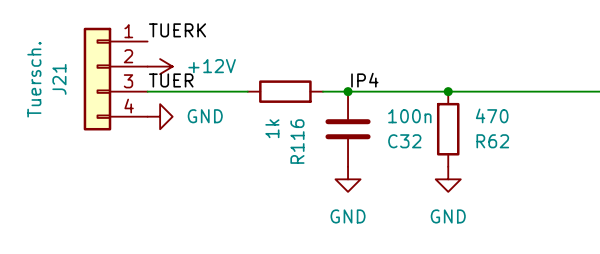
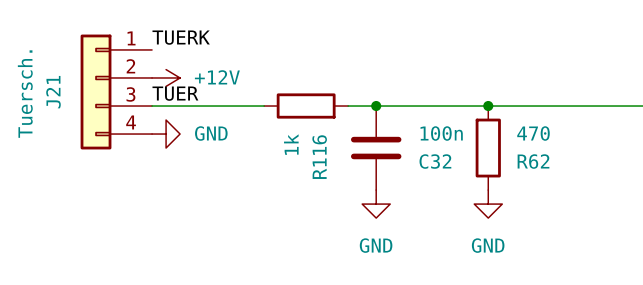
label: IP4 (364, 80) -> none

